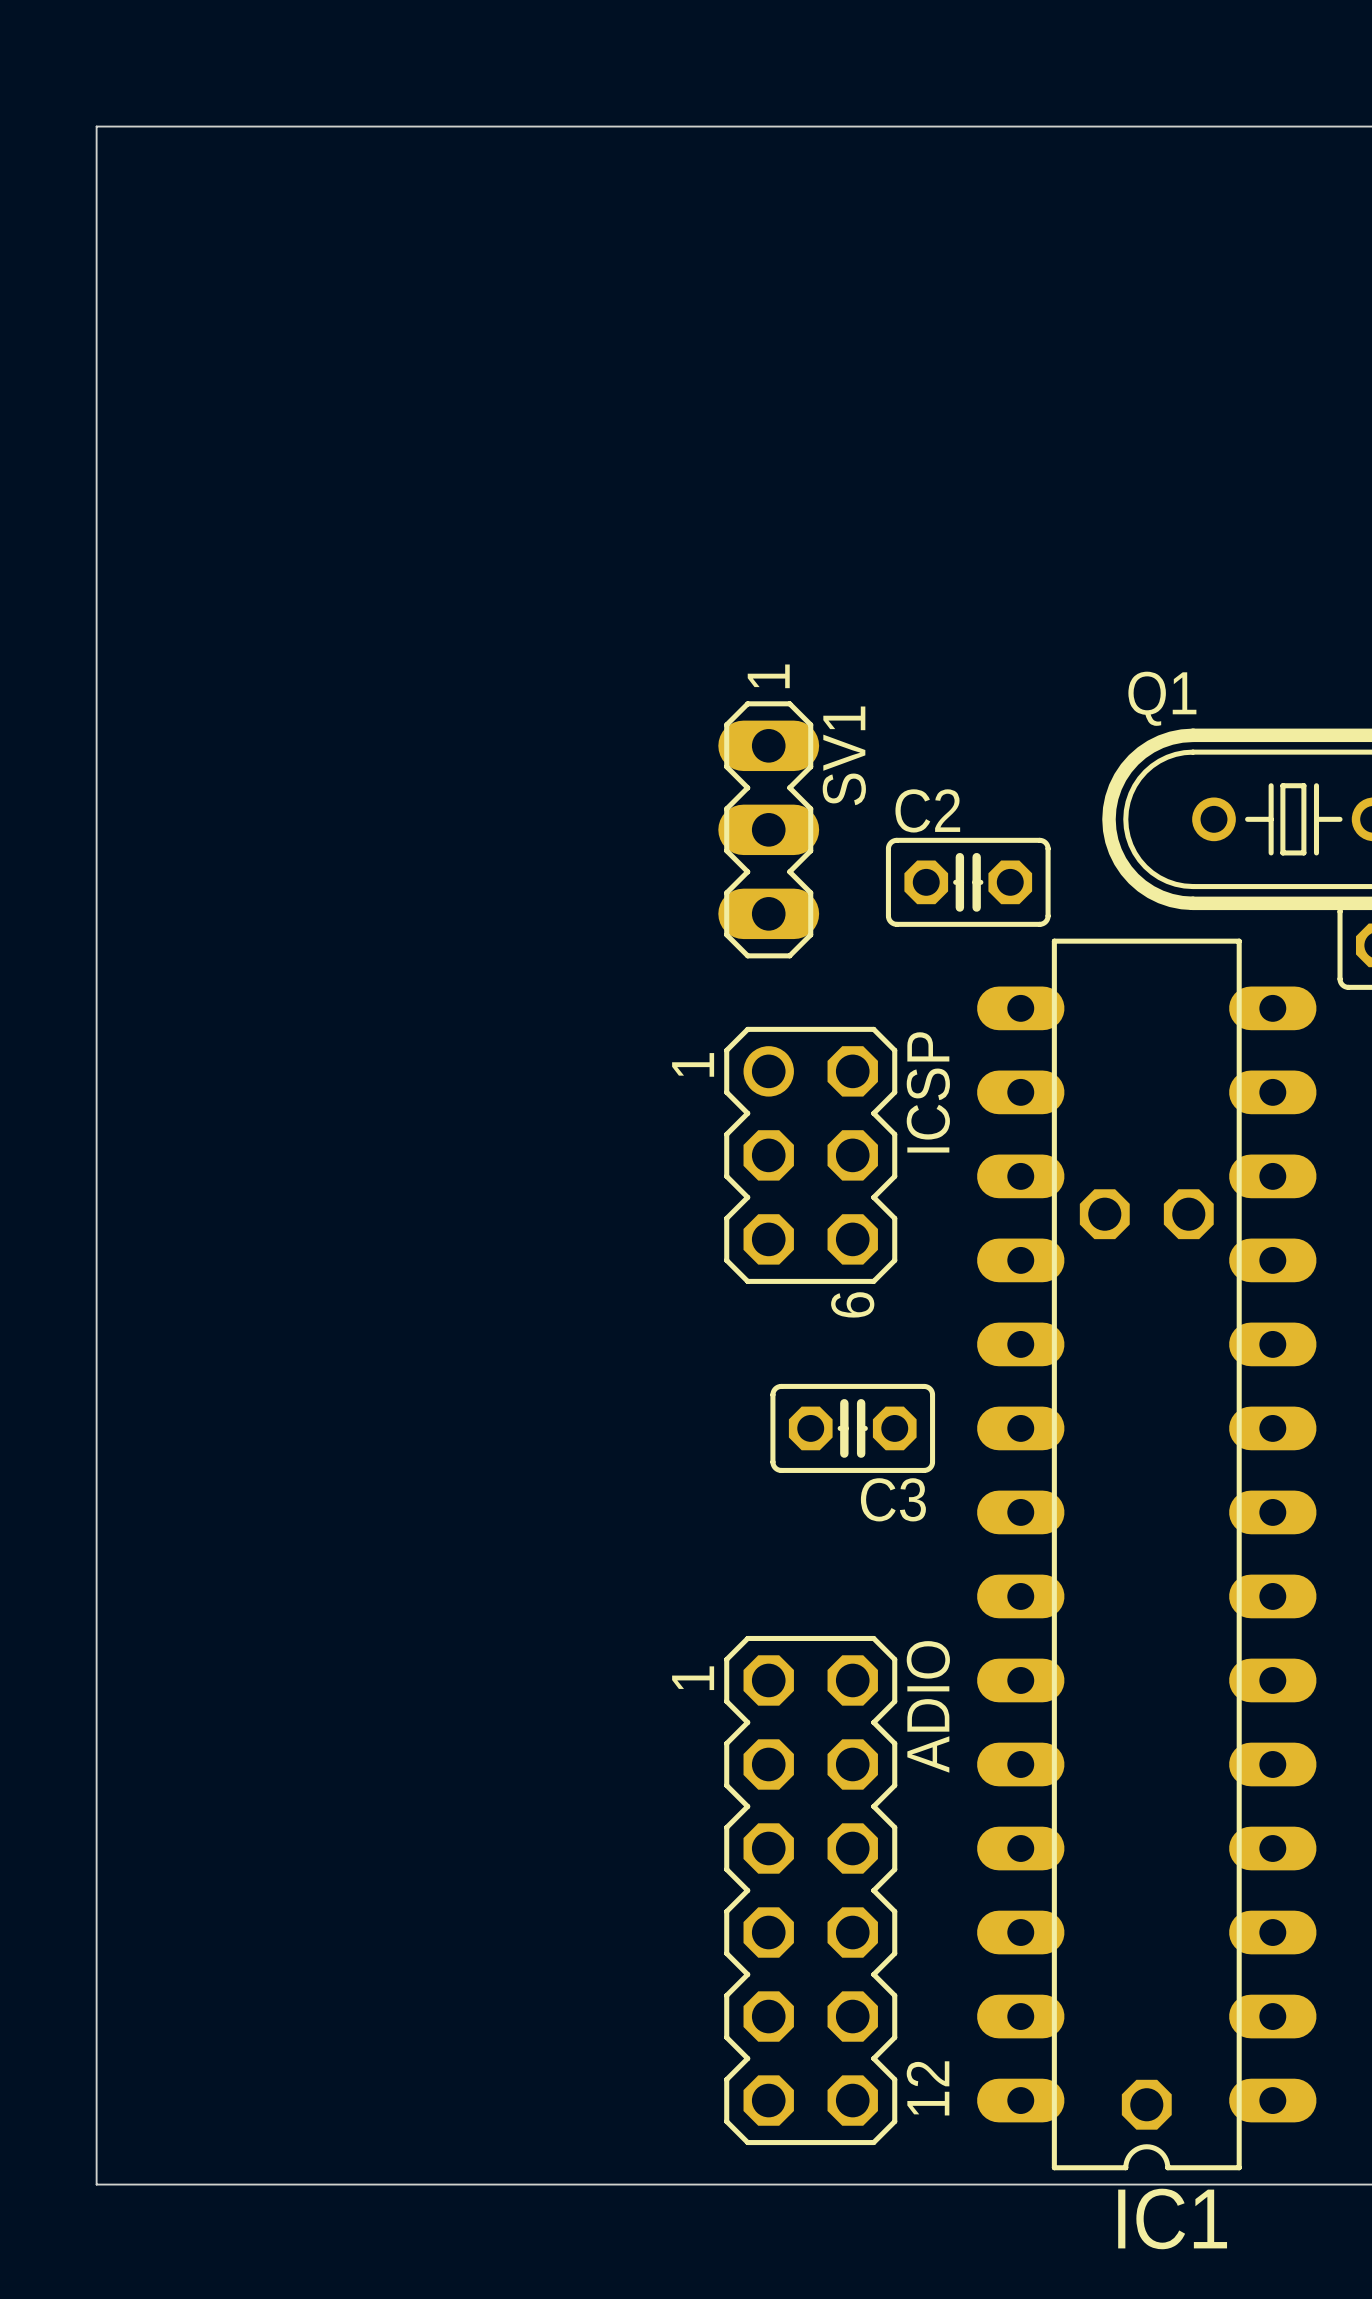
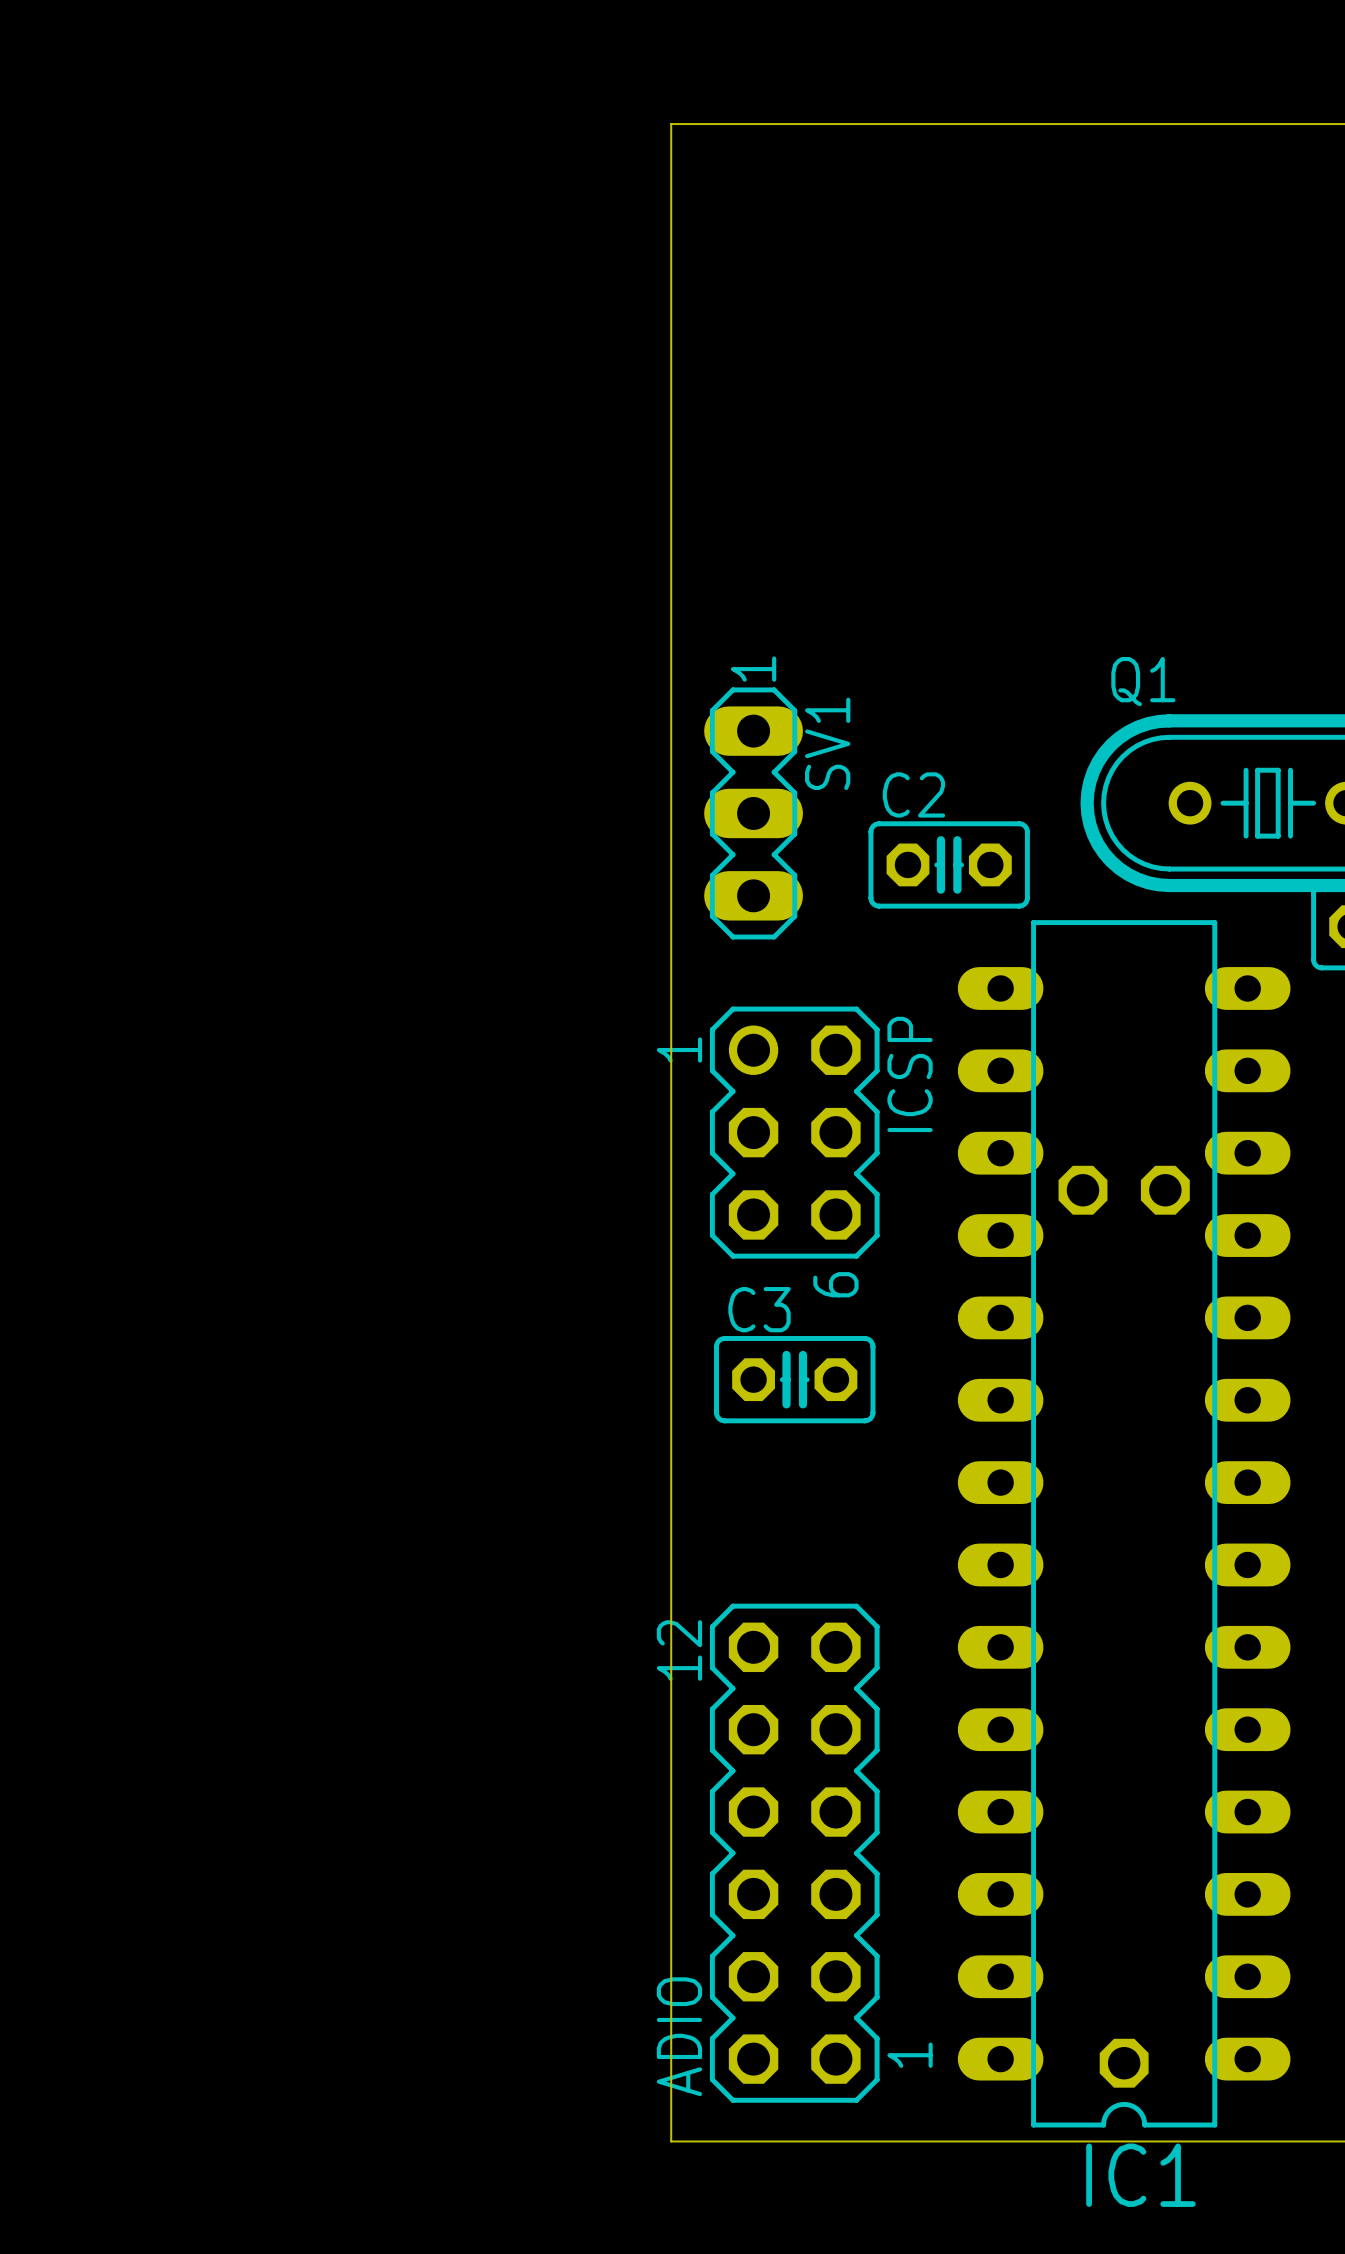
board edge: (684, 126) (96, 126) (96, 2184) (684, 2184) -> (671, 124) (671, 2141)
C3 position: (852, 1428) -> (794, 1379)
C3 name position: C3 (893, 1499) -> C3 (759, 1309)
ADIO text position: 1 (693, 1678) -> 1 (910, 2055)
ADIO name position: ADIO (928, 1706) -> ADIO (679, 2036)
ADIO text position: 12 (928, 2088) -> 12 (679, 1650)

